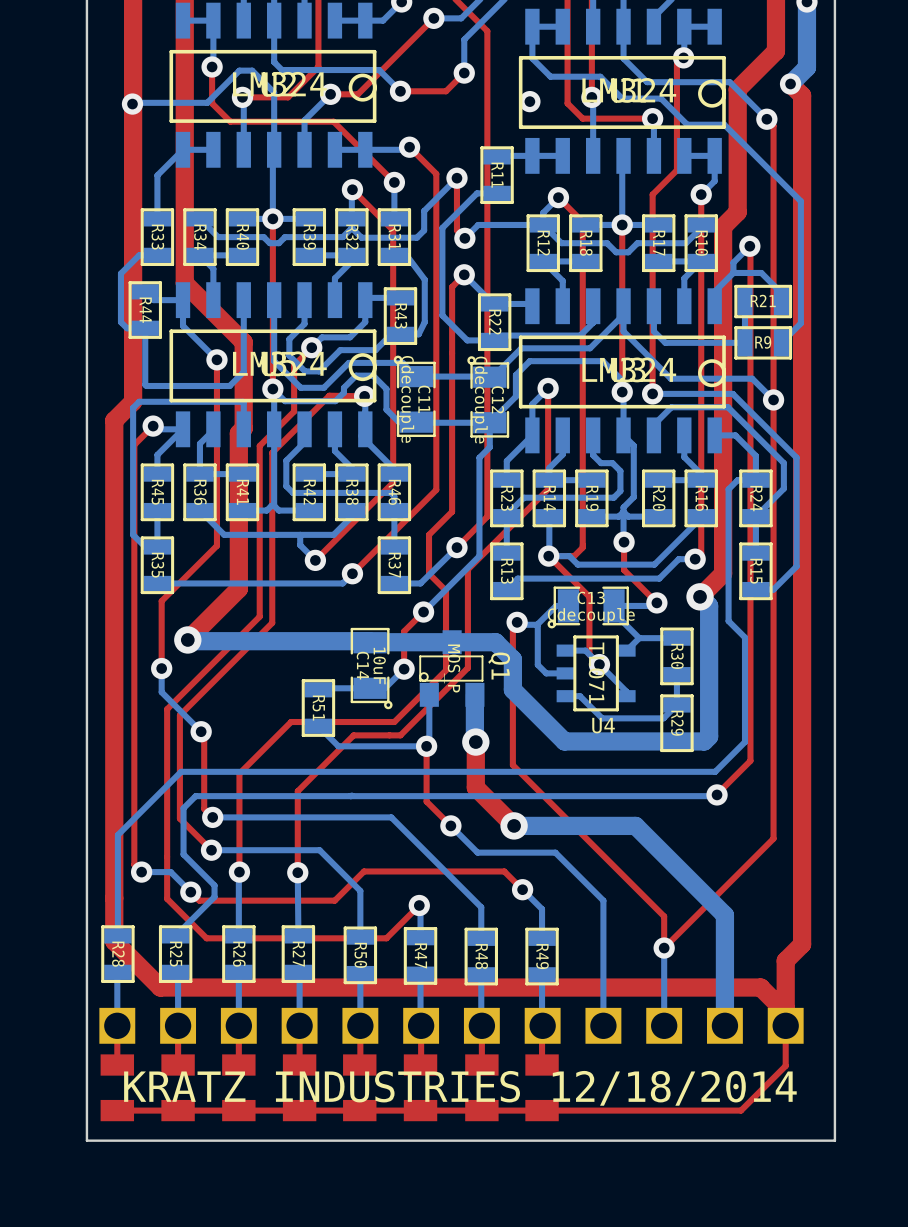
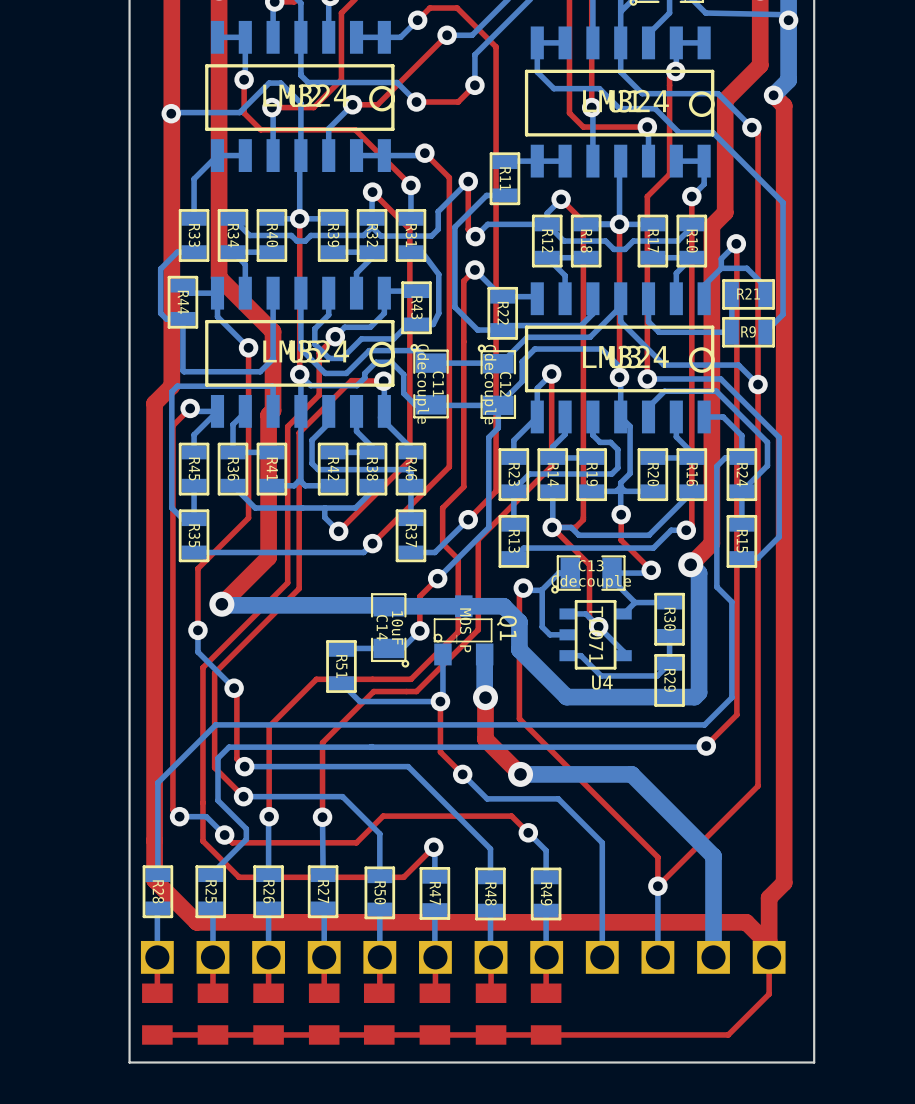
via: (529, 101) -> none
text: KRATZ INDUSTRIES 12/18/2014 (460, 1088) -> none

